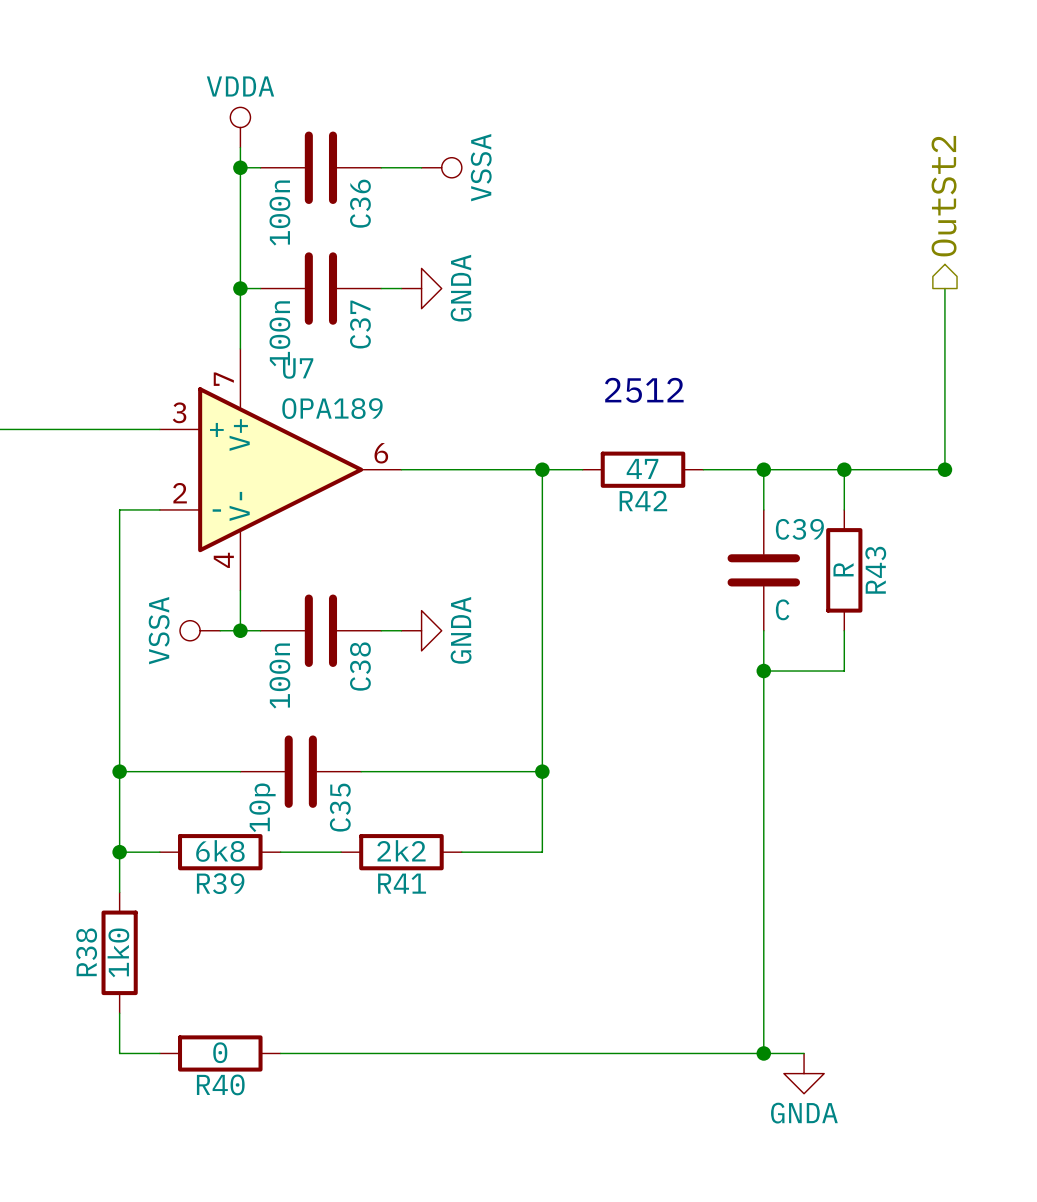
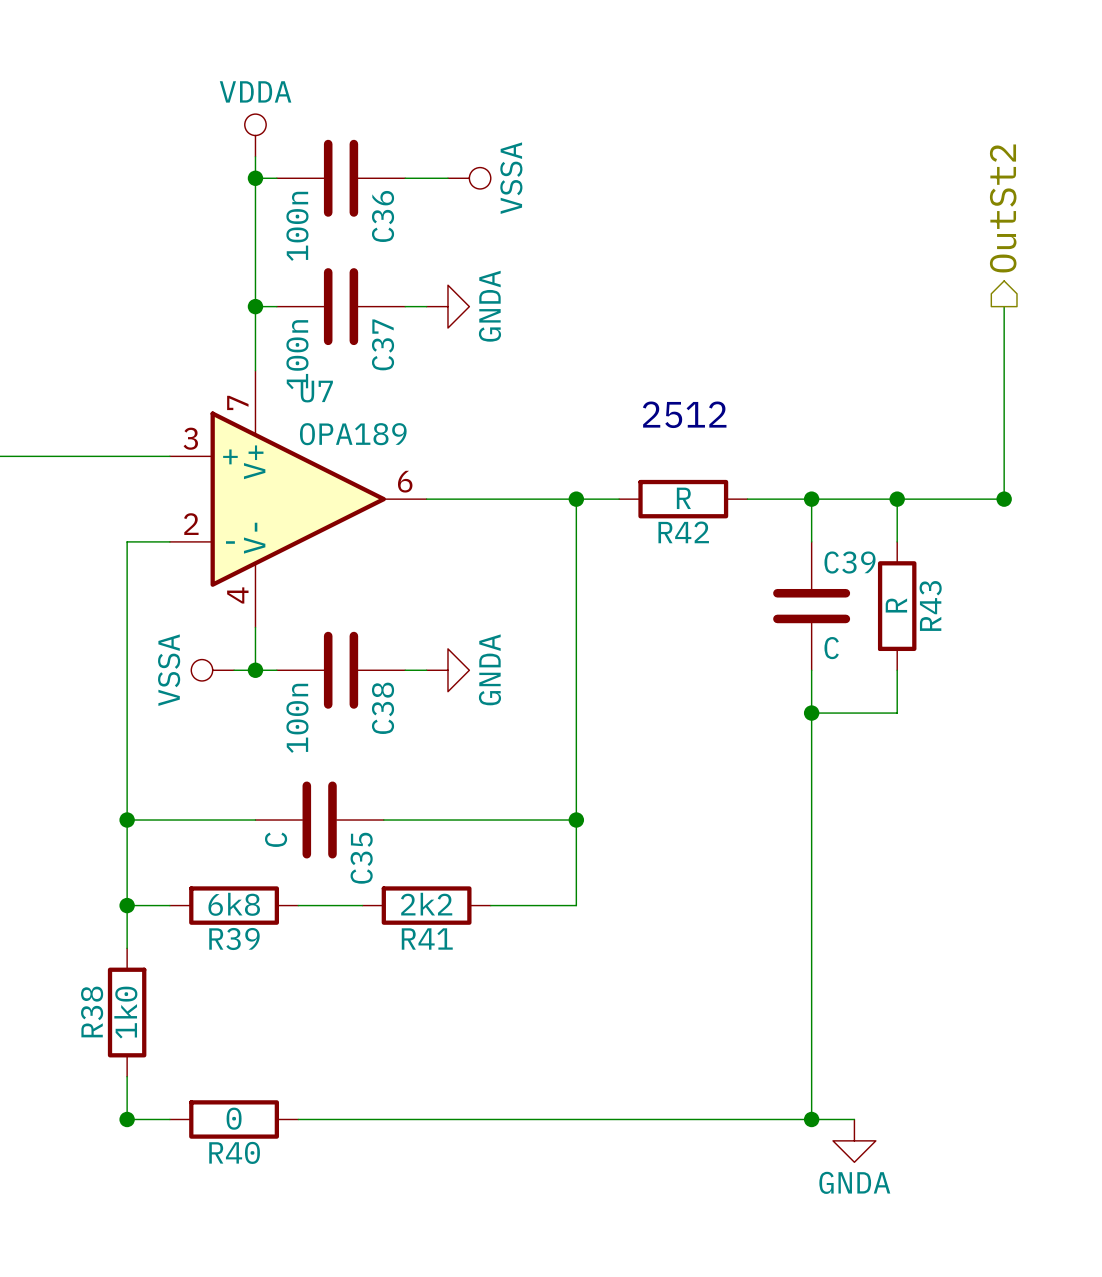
R42 value: 47 (642, 468) -> R (683, 498)
C35 value: 10p (262, 807) -> C (276, 839)
junction: none -> (127, 1119)

